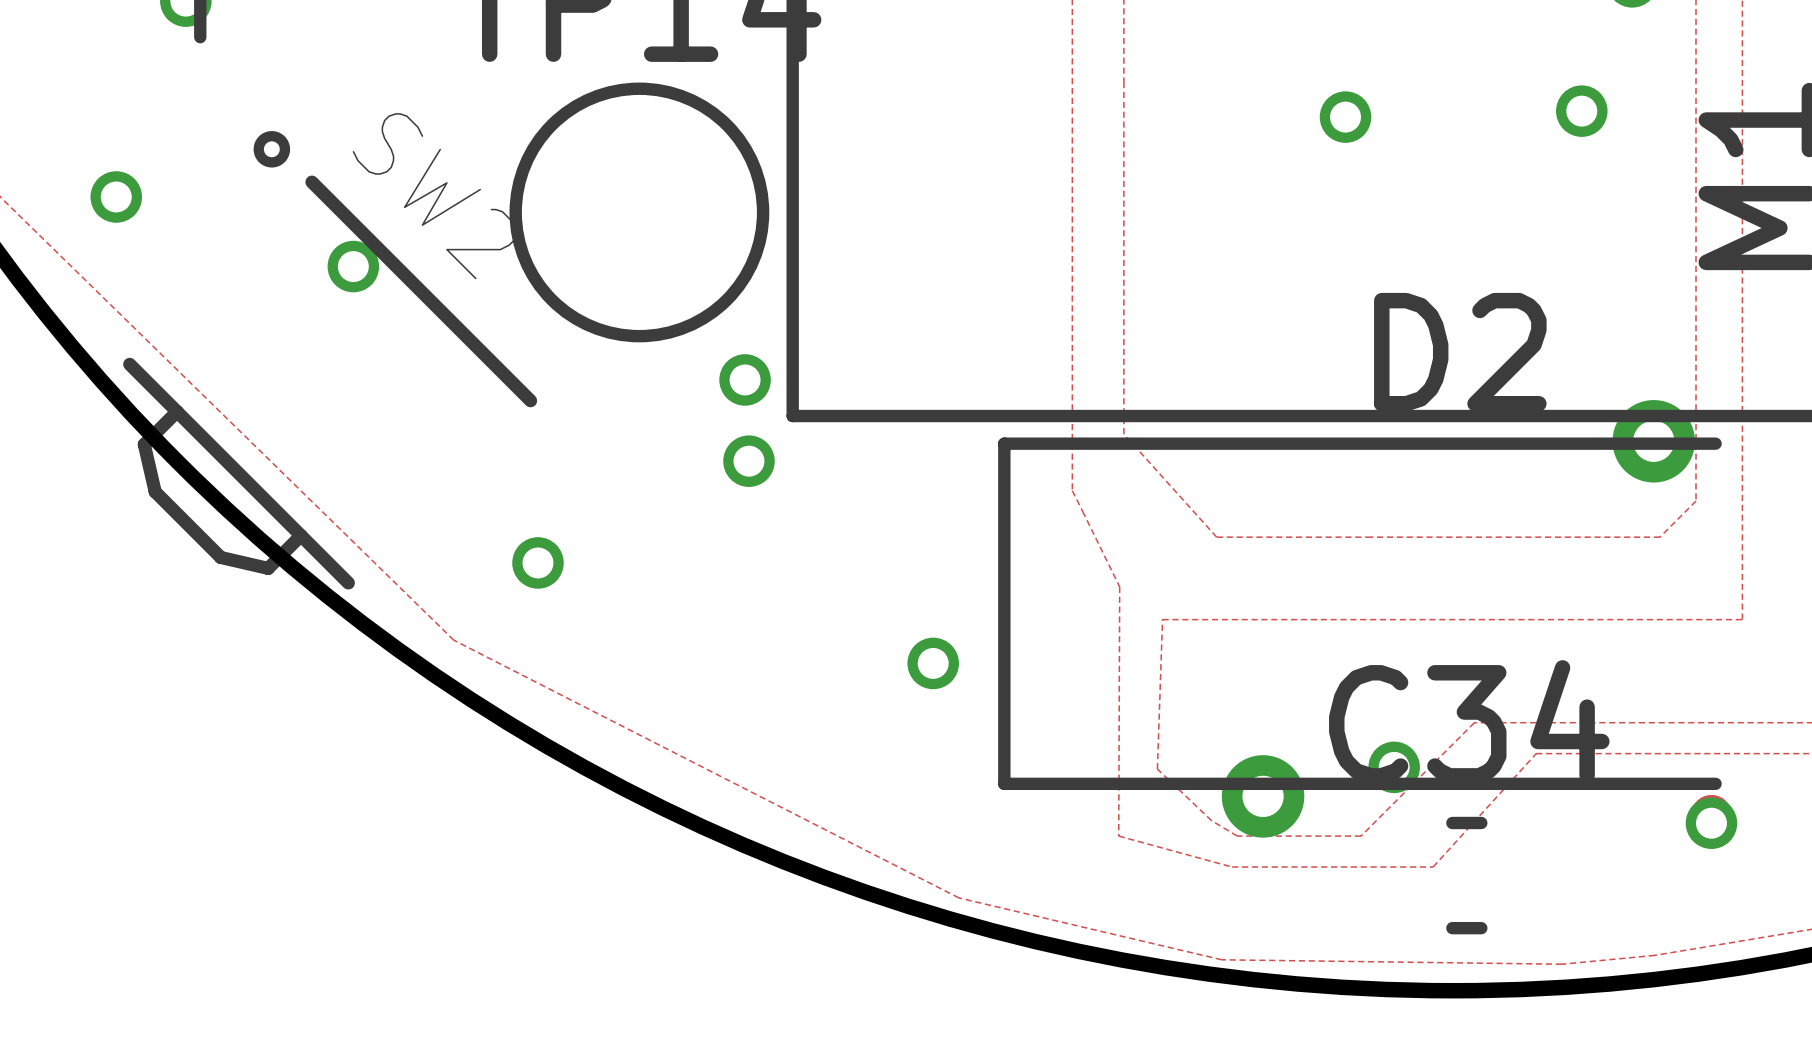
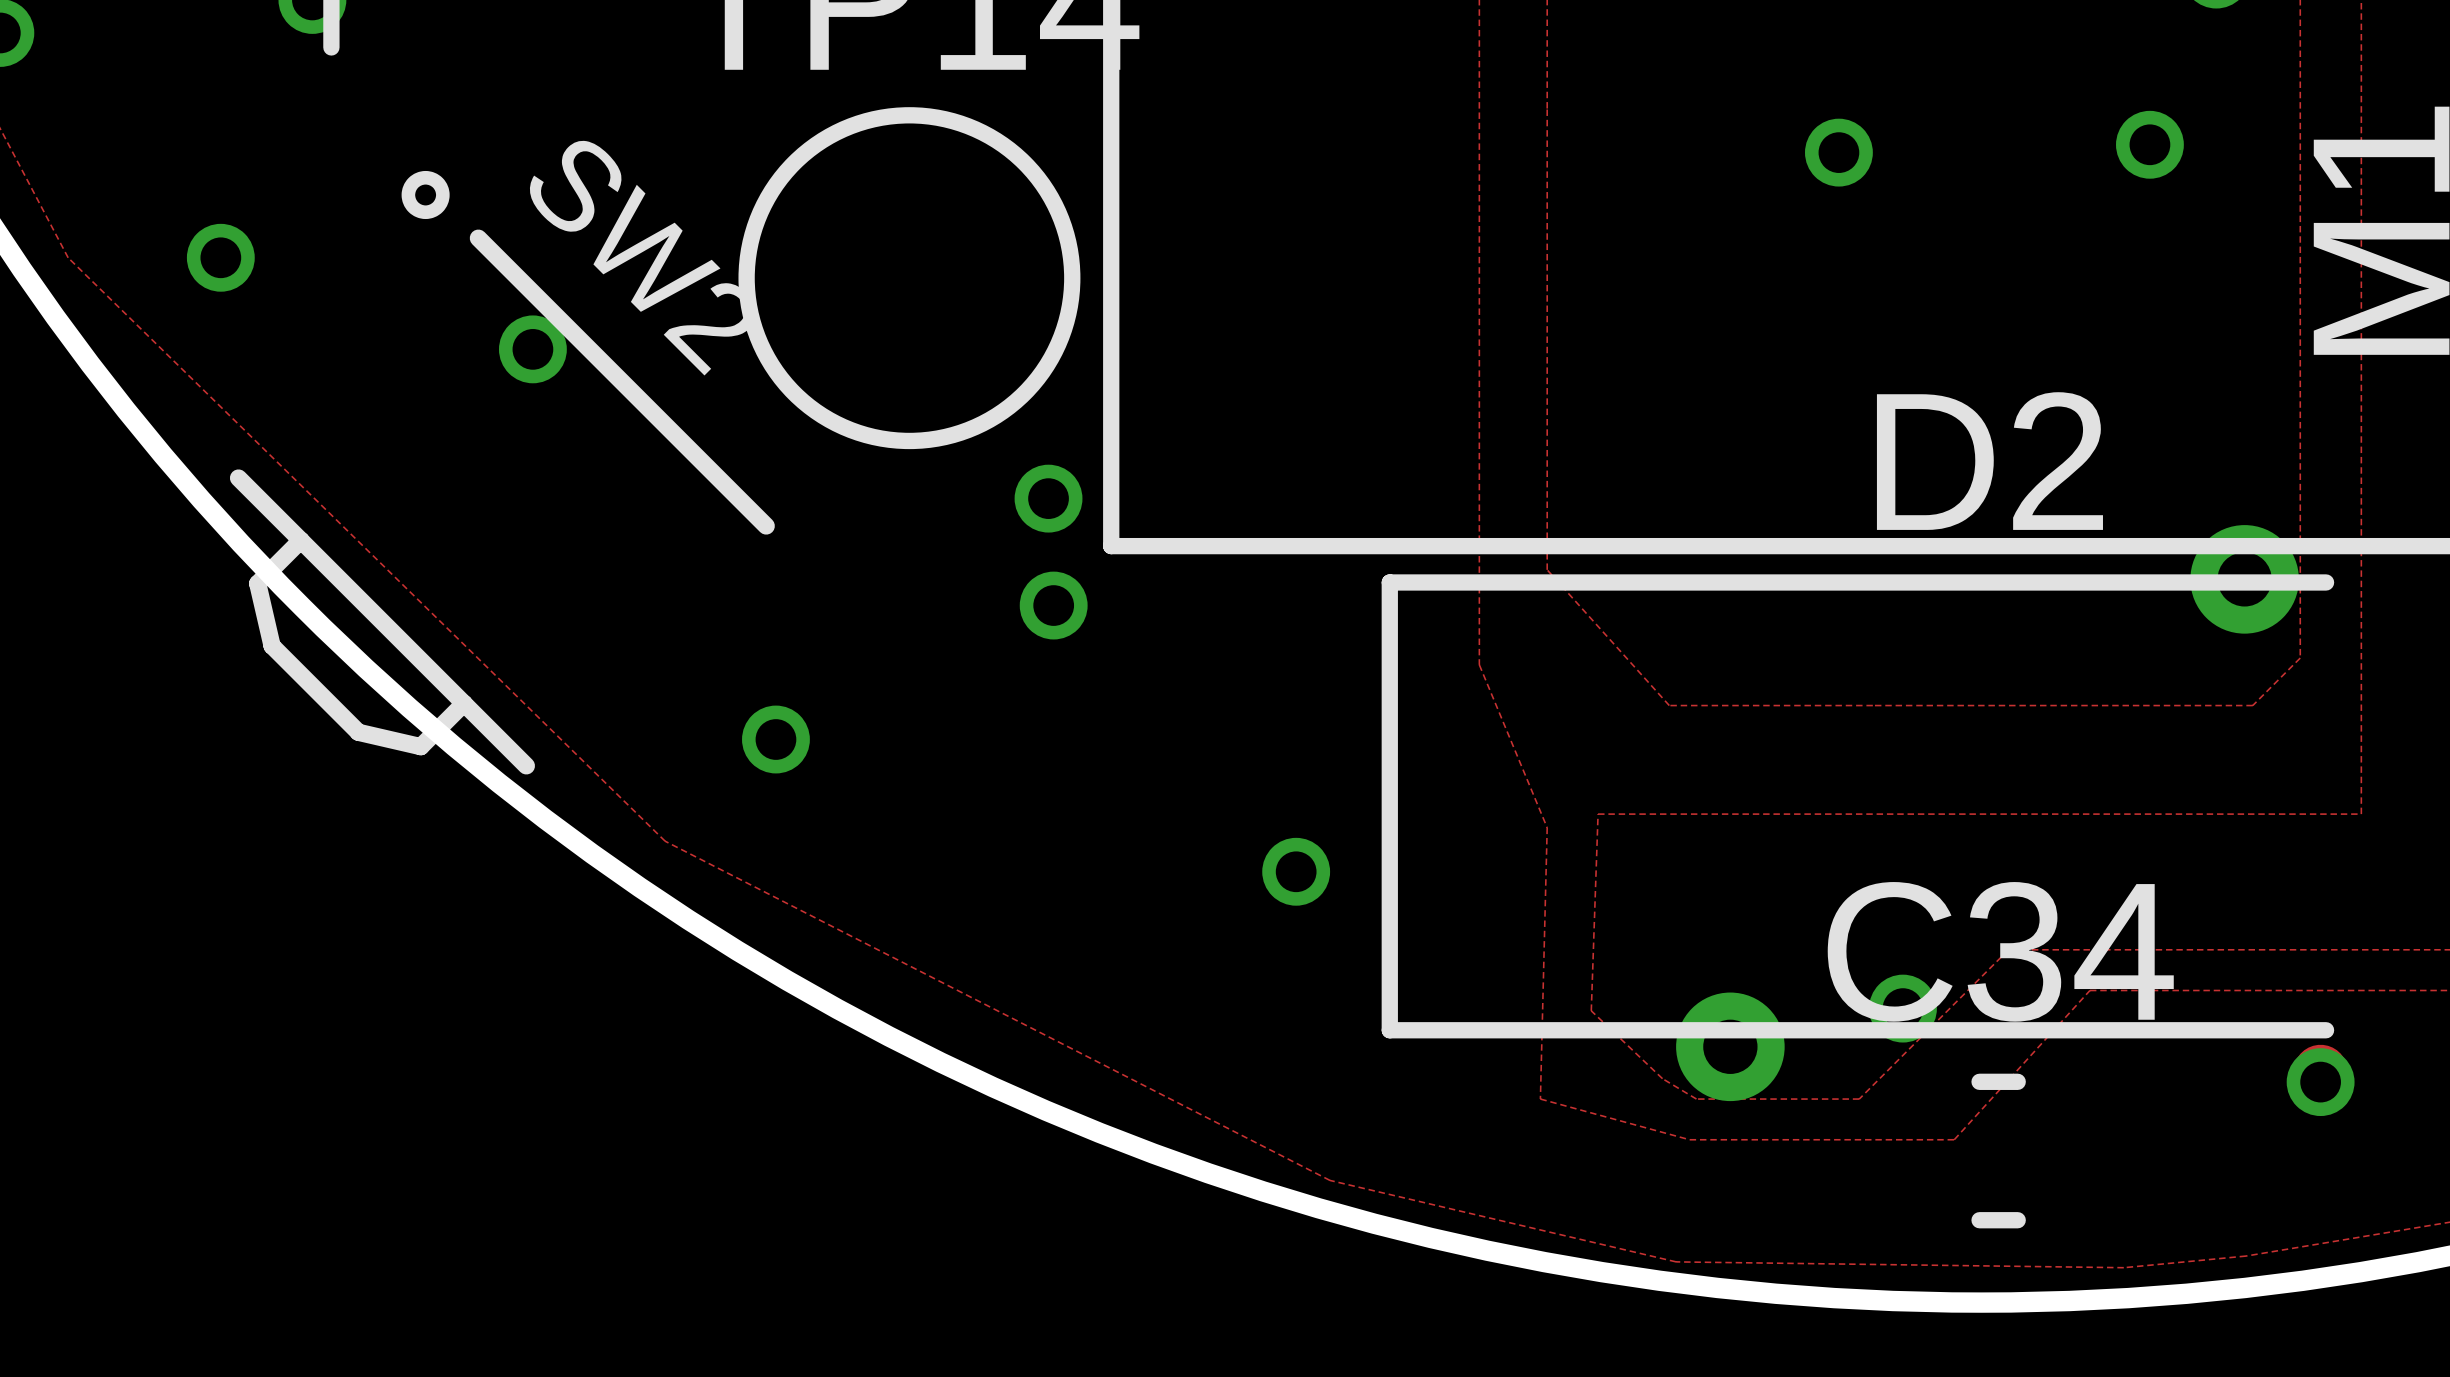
zone outline: (1072, 490) (1119, 586) (1118, 836) -> (1479, 644) (1479, 664) (1547, 827) (1540, 1099)

